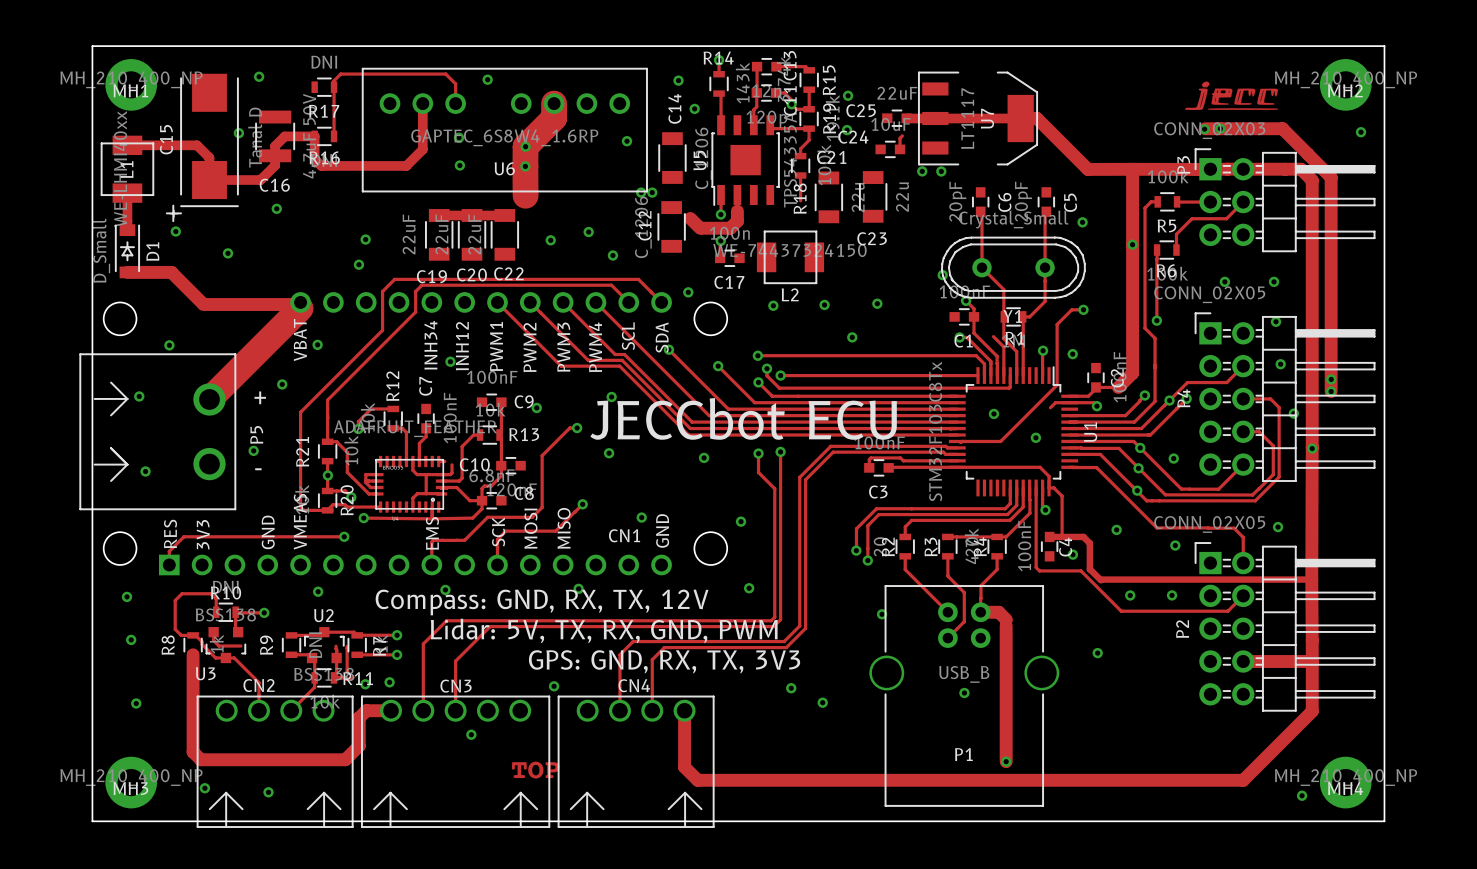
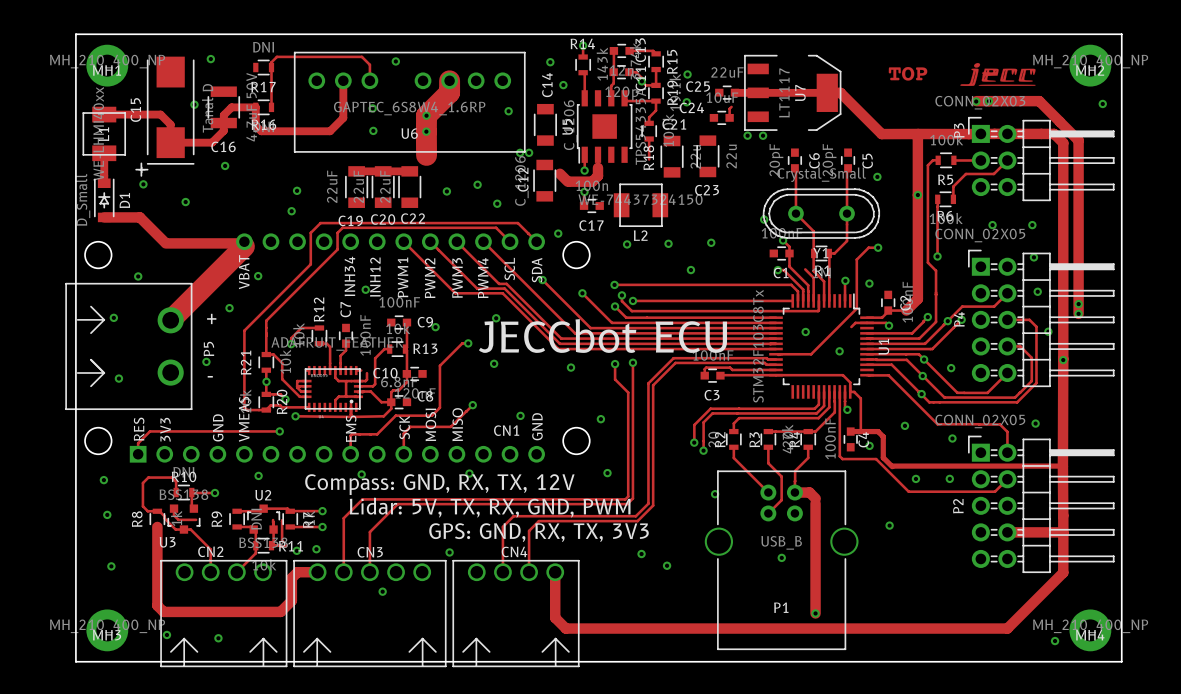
drawing: none -> [888, 67, 928, 81]
drawing: [511, 761, 560, 779] -> none

